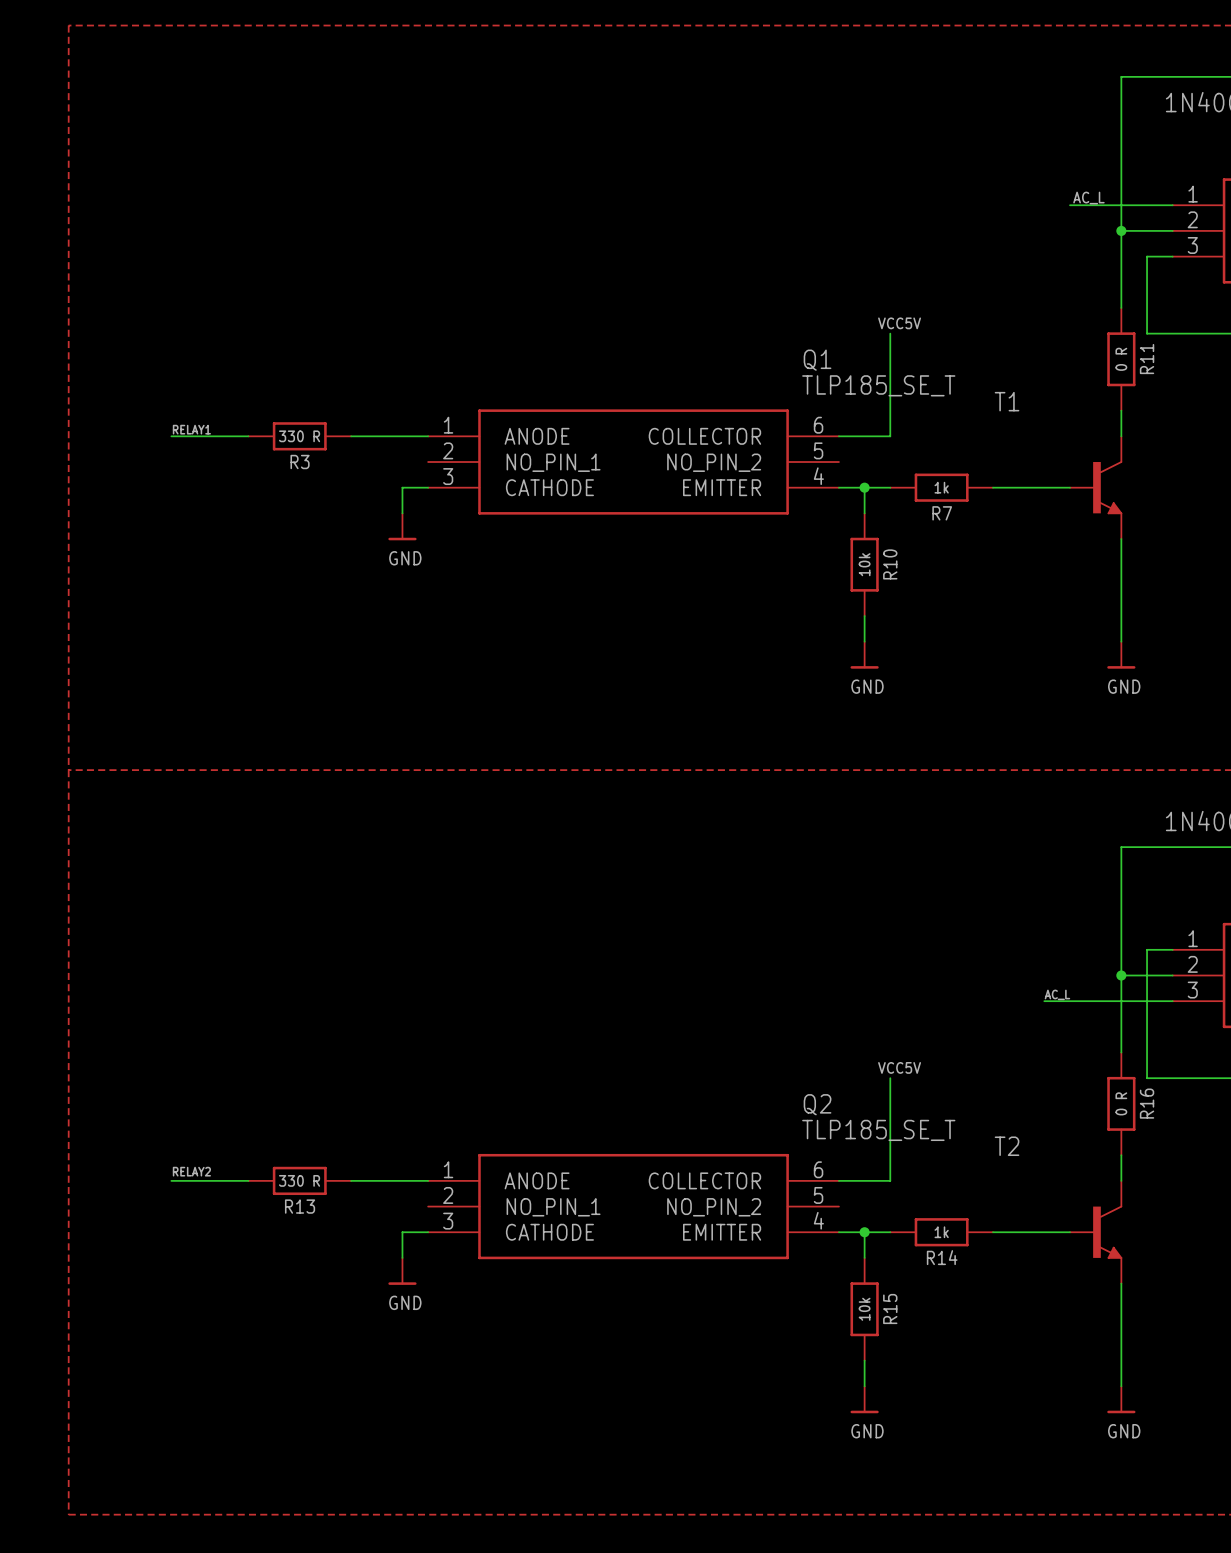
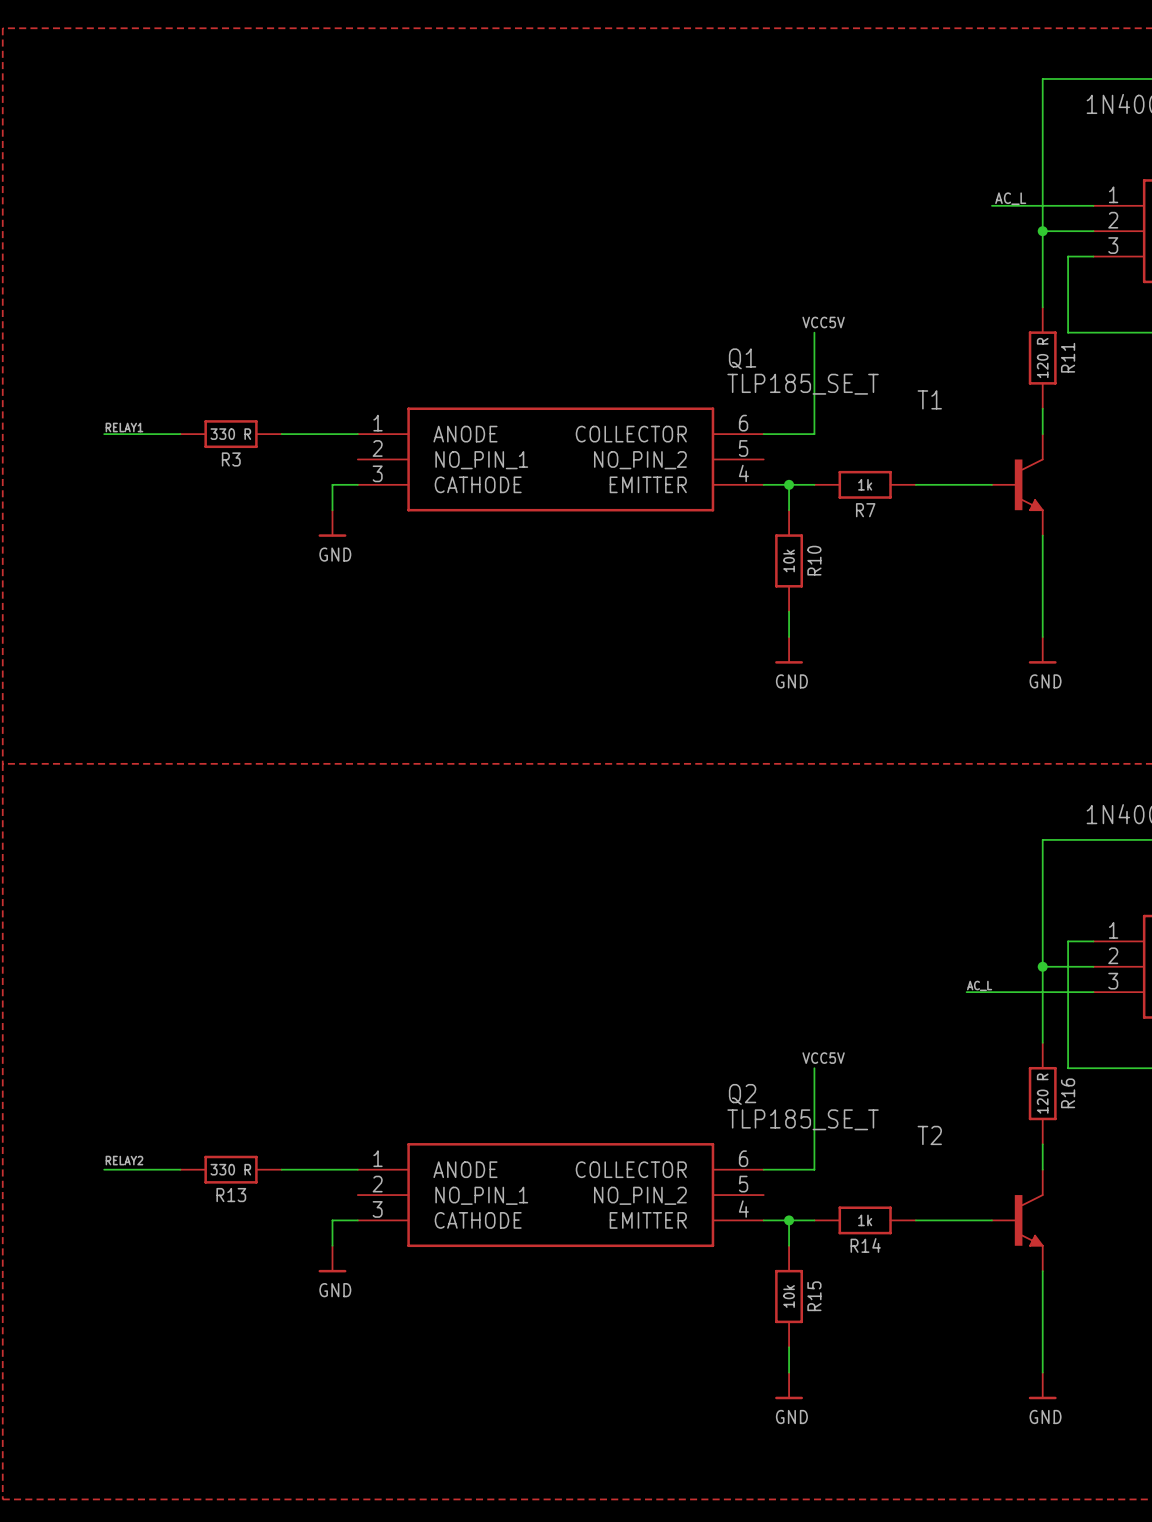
R11 value: 0 R (1121, 359) -> 120 R (1042, 358)
R16 value: 0 R (1121, 1103) -> 120 R (1042, 1093)

